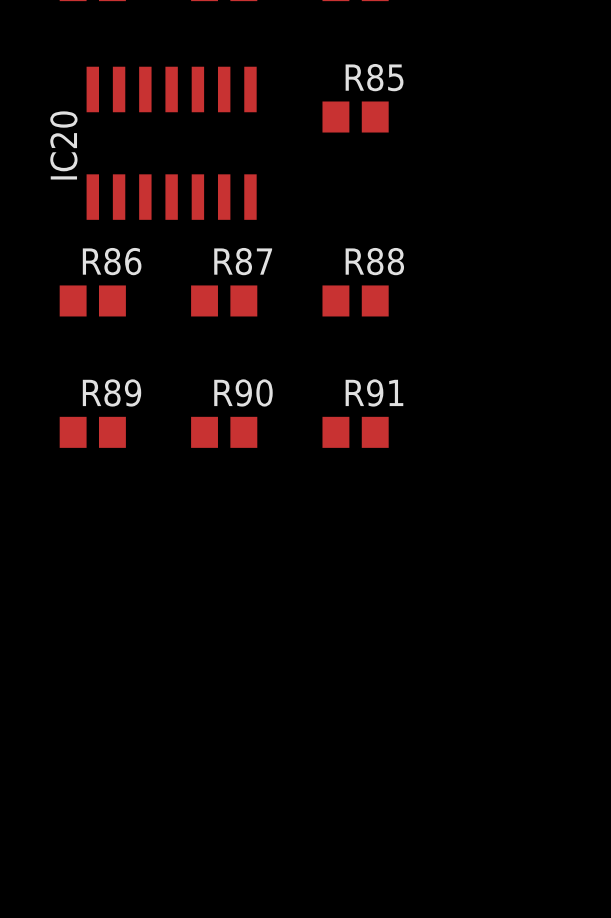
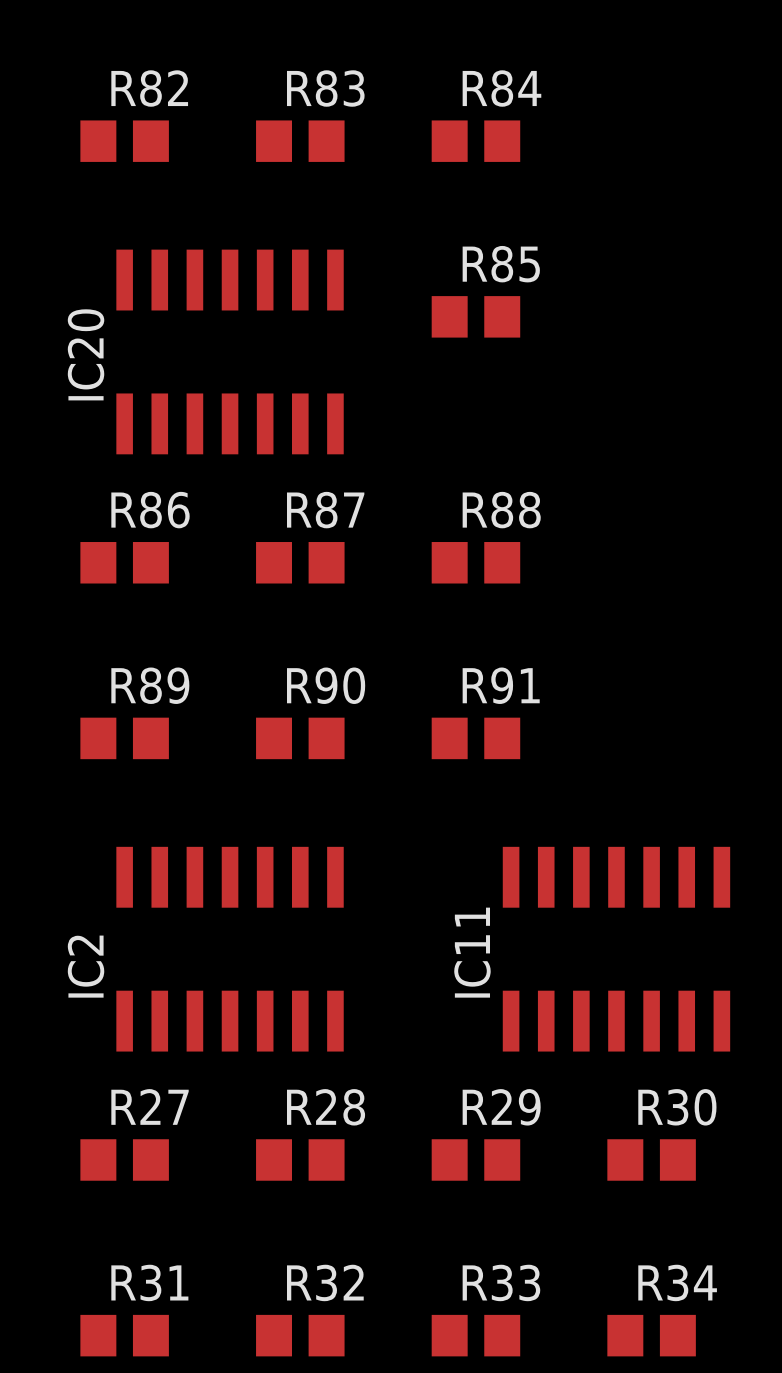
IC2: none -> (230, 949)
IC11: none -> (616, 949)
R27: none -> (124, 1159)
R28: none -> (300, 1159)
R29: none -> (475, 1159)
R30: none -> (651, 1159)
R31: none -> (124, 1335)
R32: none -> (300, 1335)
R33: none -> (475, 1335)
R34: none -> (651, 1335)

